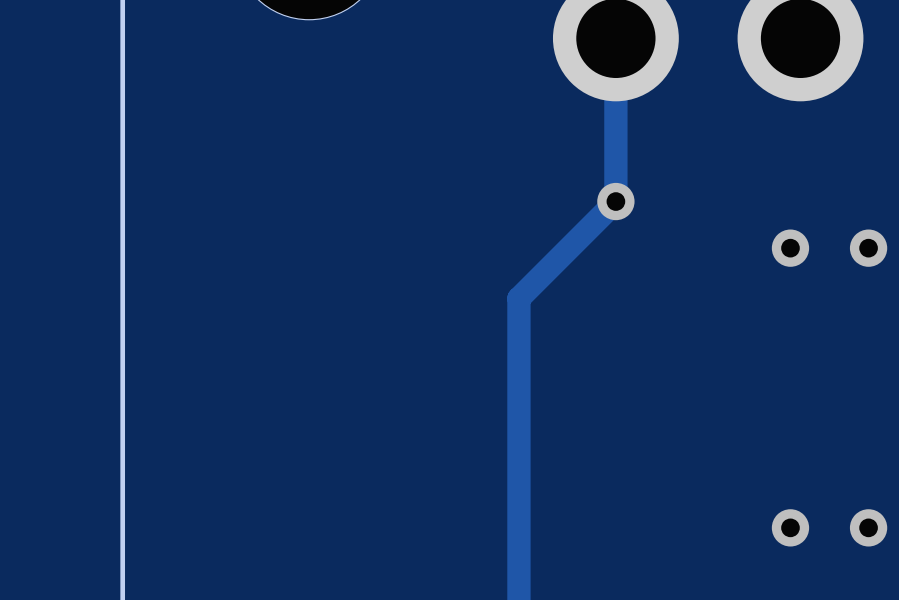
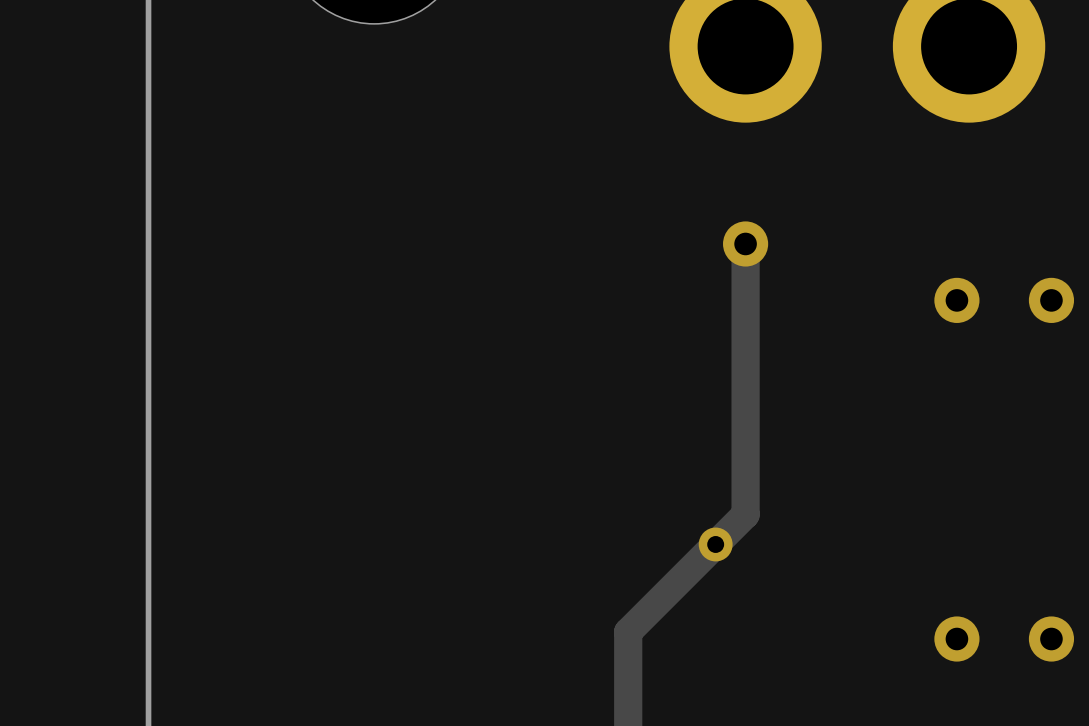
track: (615, 38) (615, 201) (518, 298) (518, 522) -> (745, 243) (745, 514) (628, 631)
via: none -> (715, 544)

